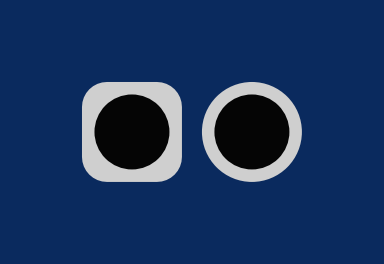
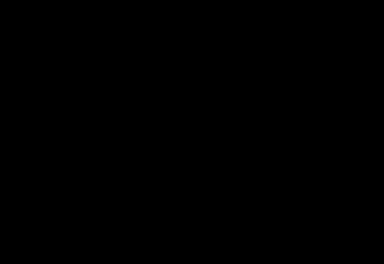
part: (191, 131) -> none

